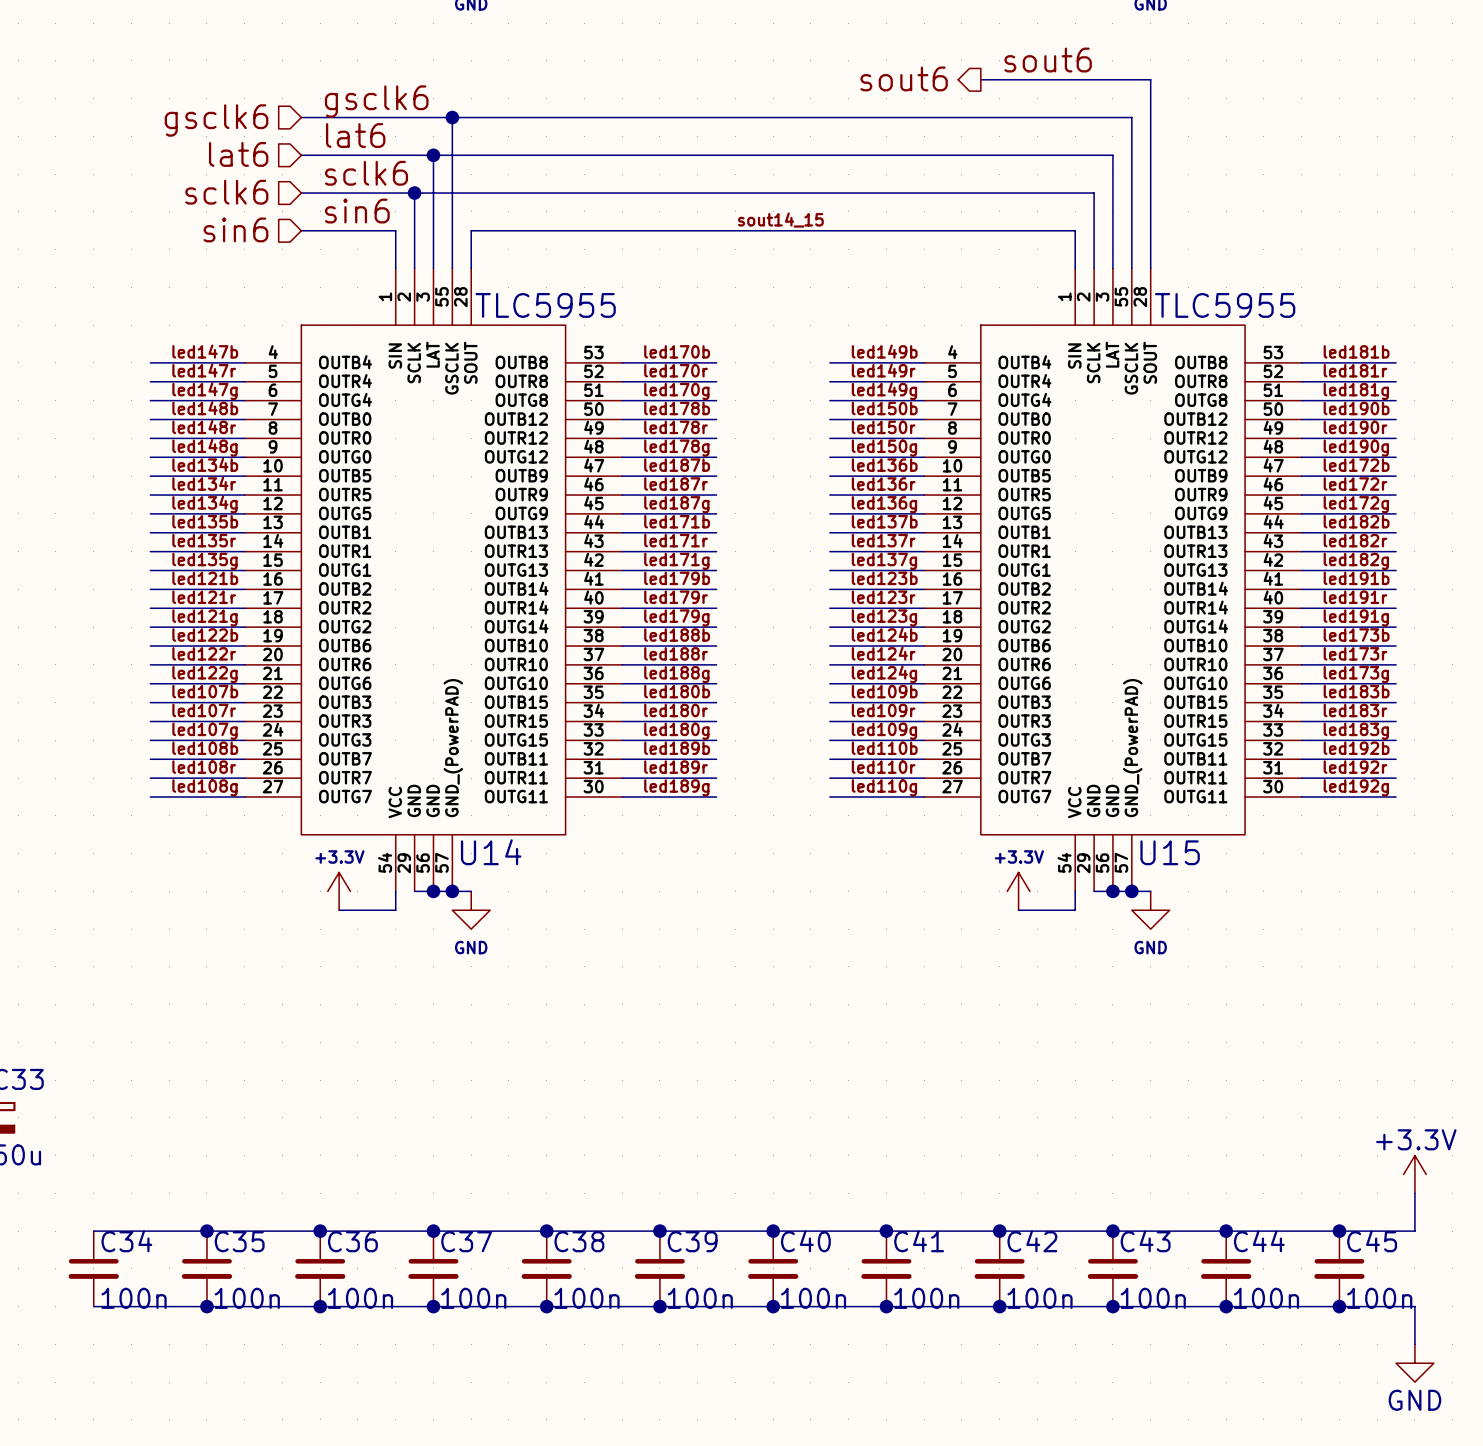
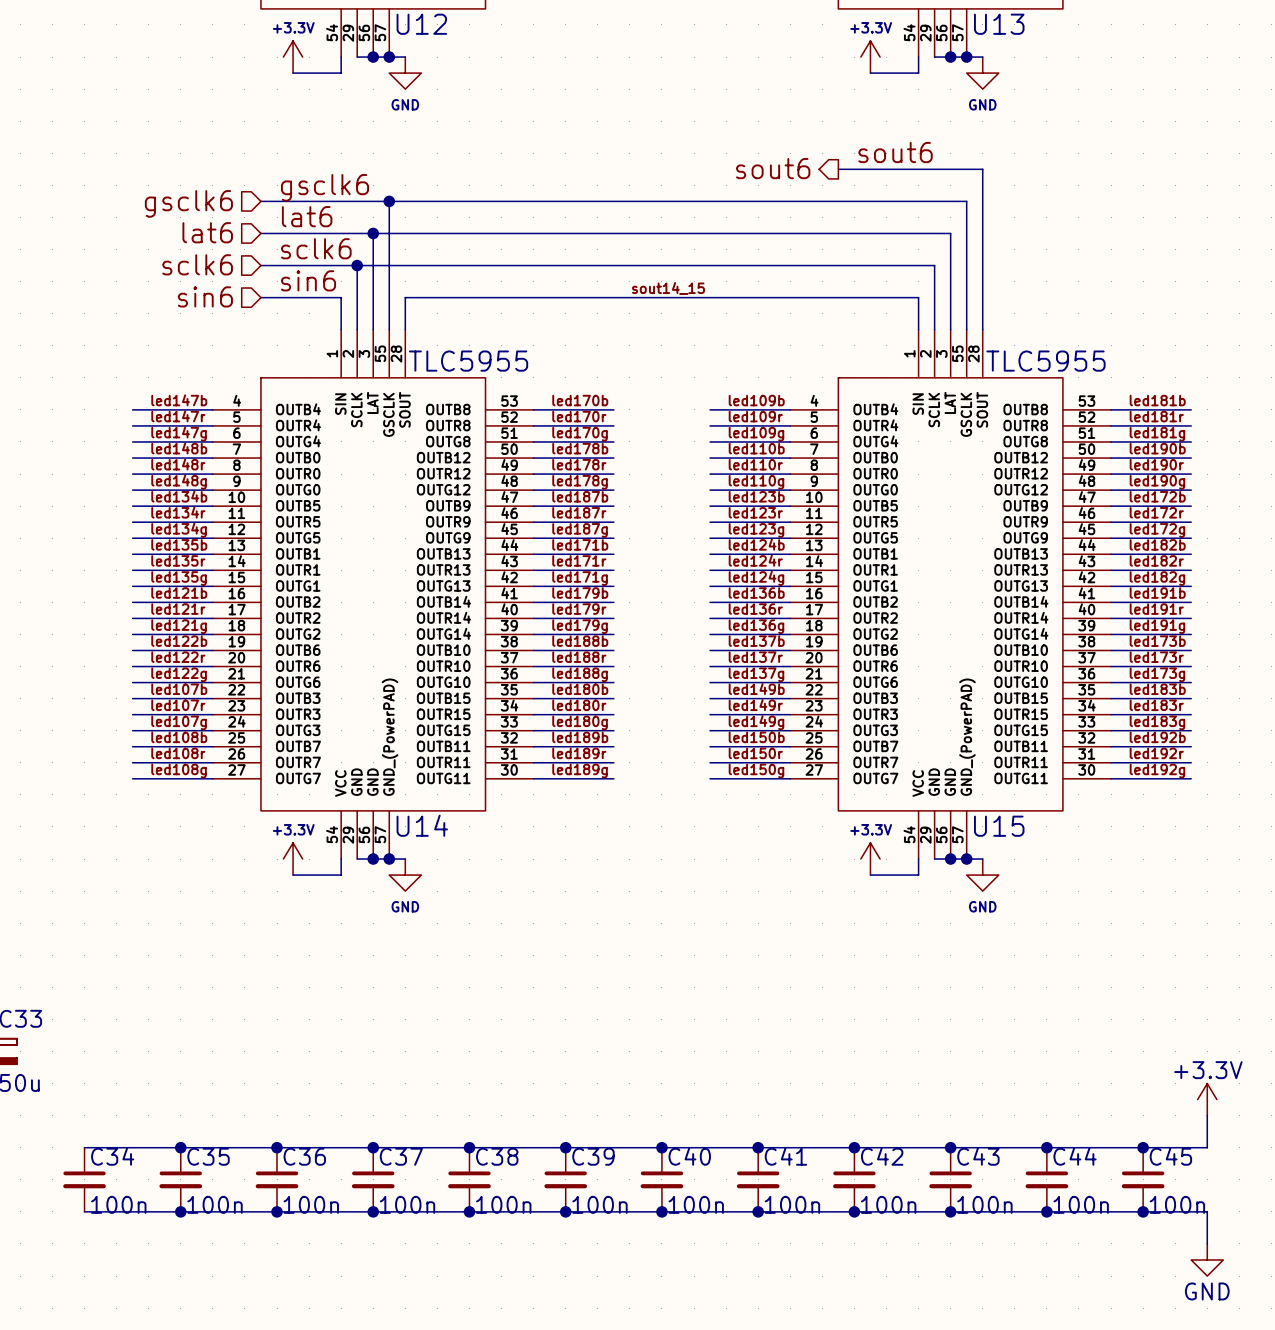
label: led149b (884, 351) -> led109b (756, 400)
label: led149r (883, 370) -> led109r (755, 416)
label: led149g (884, 391) -> led109g (756, 434)
label: led150b (884, 408) -> led110b (756, 448)
label: led150r (883, 427) -> led110r (755, 464)
label: led150g (884, 448) -> led110g (756, 482)
label: led136b (884, 465) -> led123b (756, 496)
label: led136r (883, 484) -> led123r (755, 512)
label: led136g (884, 504) -> led123g (756, 530)
label: led137b (884, 521) -> led124b (756, 544)
label: led137r (883, 540) -> led124r (755, 560)
label: led137g (884, 561) -> led124g (756, 578)
label: led123b (884, 578) -> led136b (756, 593)
label: led123r (883, 597) -> led136r (755, 609)
label: led123g (884, 618) -> led136g (756, 626)
label: led124b (884, 634) -> led137b (756, 641)
label: led124r (883, 653) -> led137r (755, 657)
label: led124g (884, 674) -> led137g (756, 674)
label: led109b (884, 691) -> led149b (756, 689)
label: led109r (883, 710) -> led149r (755, 705)
label: led109g (884, 731) -> led149g (756, 722)
label: led110b (884, 748) -> led150b (756, 737)
label: led110r (883, 767) -> led150r (755, 753)
label: led110g (884, 787) -> led150g (756, 771)

